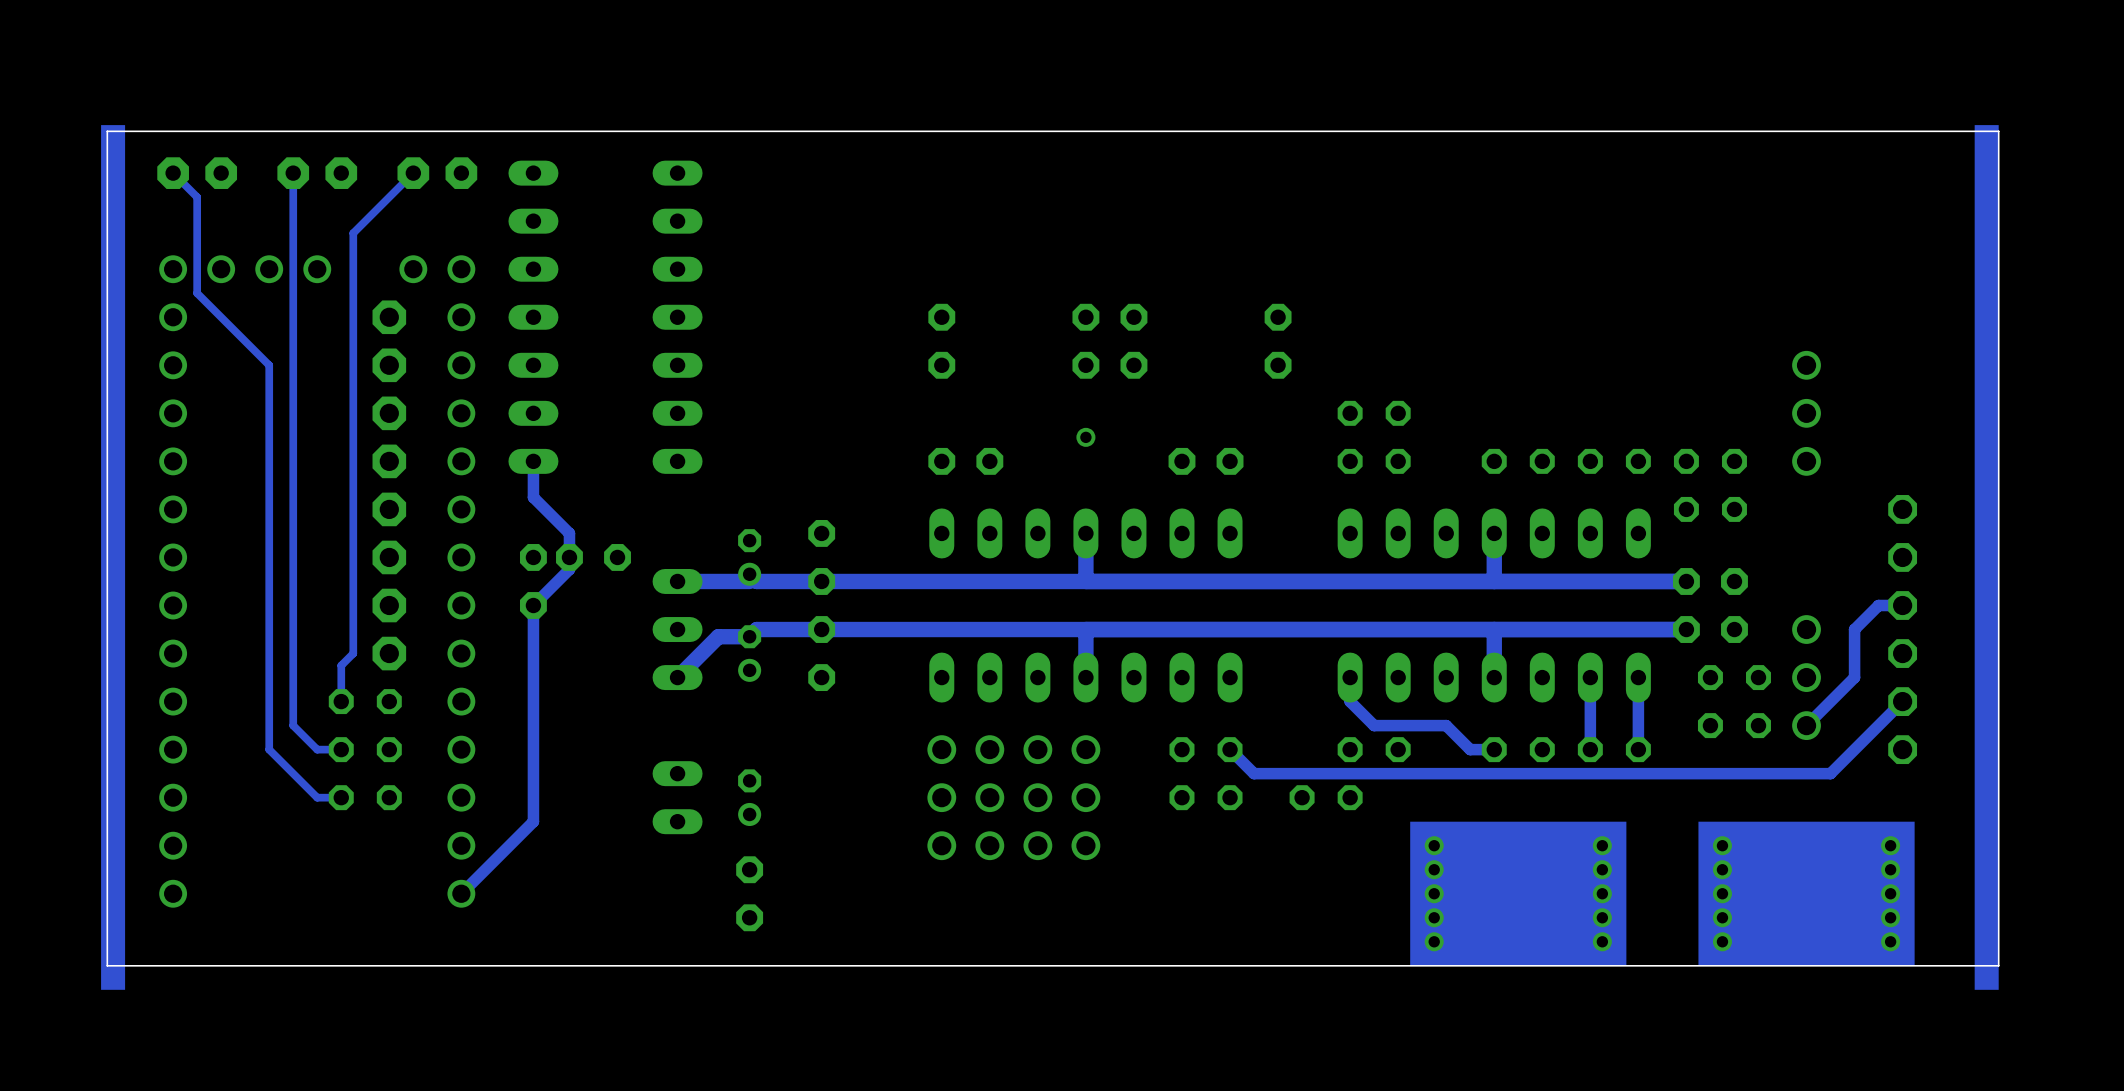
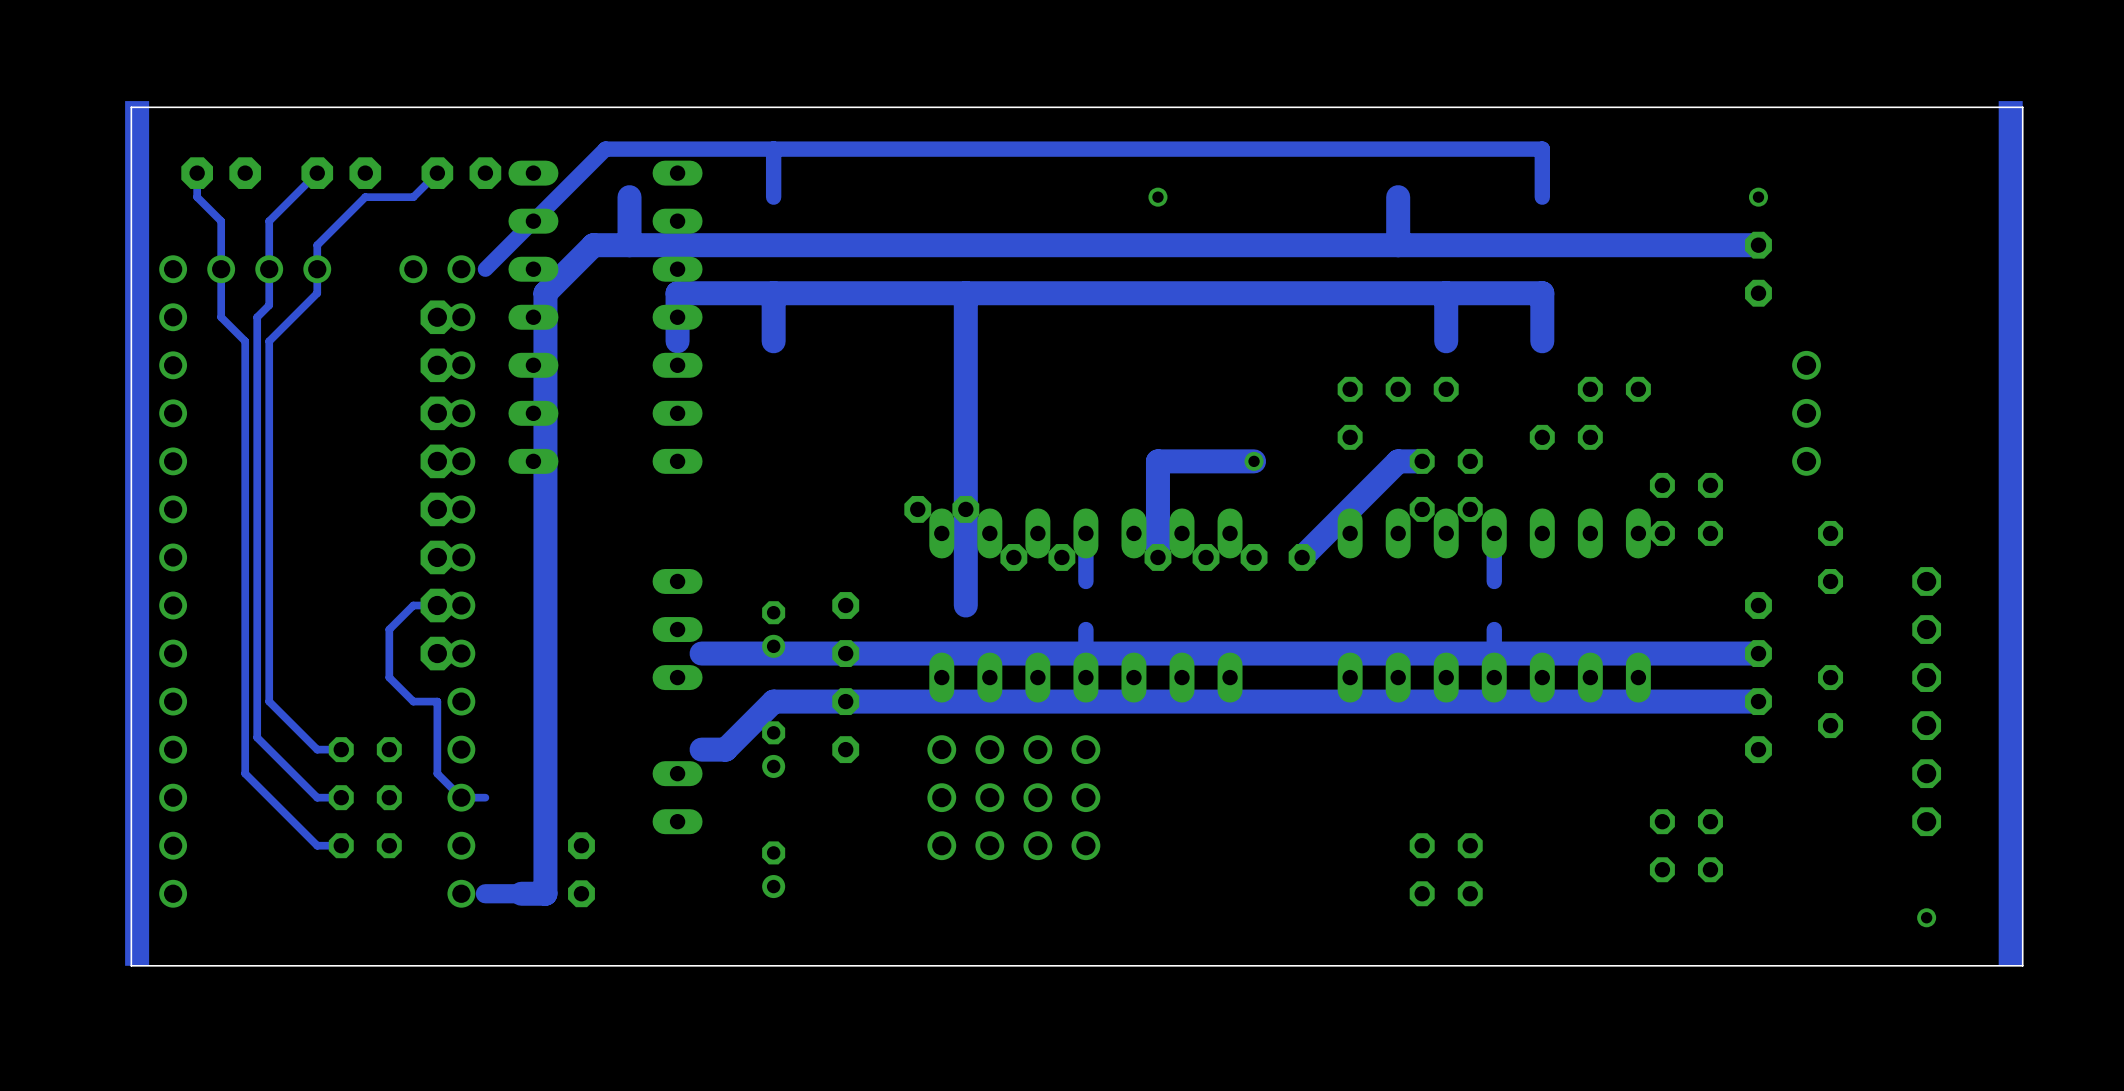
track: none -> (773, 149) (773, 197)
track: (173, 173) (197, 197) (197, 293) (221, 317) -> (197, 173) (197, 197) (221, 221) (221, 317)
part position: (197, 173) -> (221, 173)
track: (293, 173) (293, 725) -> none
track: none -> (317, 173) (269, 221) (269, 305) (257, 317) (257, 737) (269, 749)
part position: (317, 173) -> (341, 173)
track: (413, 173) (353, 233) (353, 653) (341, 665) (341, 701) -> none
part position: (437, 173) -> (461, 173)
track: none -> (629, 197) (629, 245)
via: none -> (1157, 197)
track: none -> (1398, 197) (1398, 245)
track: none -> (1542, 197) (1542, 149) (605, 149) (485, 269)
via: none -> (1758, 197)
track: none -> (1758, 245) (593, 245) (545, 293) (545, 893) (485, 893)
part: none -> (1758, 269)
track: none -> (773, 293) (773, 341)
track: none -> (965, 293) (965, 605)
track: none -> (1446, 293) (1446, 341)
track: (245, 341) (269, 365) -> (437, 173) (413, 197) (365, 197) (317, 245) (317, 293) (269, 341) (269, 365)
track: none -> (245, 341) (245, 773) (317, 845) (341, 845)
part: (941, 341) -> none
part: (1085, 341) -> none
part: (1133, 341) -> none
part: (1278, 341) -> none
track: none -> (1542, 341) (1542, 293) (677, 293) (677, 341)
part: none -> (1422, 389)
part: none -> (1614, 389)
part rotation: 0° (1374, 413) -> 90° clockwise (1350, 413)
via: (1085, 437) -> none
part: none -> (1566, 437)
track: (533, 461) (533, 497) (569, 533) (569, 569) (533, 605) (533, 821) (461, 893) -> none
part position: (965, 461) -> (941, 509)
part: (1206, 461) -> none
track: none -> (1254, 461) (1157, 461) (1157, 557)
via: none -> (1254, 461)
part: (1374, 461) -> none
track: none -> (1422, 461) (1398, 461) (1302, 557)
part: none -> (1446, 461)
part: (1518, 461) -> none
part: (1614, 461) -> none
part: (1710, 461) -> none
part position: (389, 485) -> (437, 485)
part: none -> (1686, 485)
part: none -> (1446, 509)
part: (1710, 509) -> none
part: none -> (1686, 533)
drawing position: (113, 557) -> (137, 533)
part: (593, 557) -> none
part: (749, 557) -> none
part: (821, 557) -> none
part: none -> (1037, 557)
part: none -> (1181, 557)
part: none -> (1278, 557)
part: none -> (1830, 557)
drawing position: (1986, 557) -> (2010, 533)
part: (533, 581) -> none
track: (1686, 581) (756, 581) (749, 574) (749, 581) (677, 581) -> none
part: (1710, 581) -> none
track: none -> (437, 605) (413, 605) (389, 629) (389, 677) (413, 701) (437, 701) (437, 773) (461, 797) (485, 797)
track: (1902, 605) (1878, 605) (1854, 629) (1854, 677) (1806, 725) -> none
track: (1686, 629) (756, 629) (749, 636) (718, 636) (677, 677) -> none
part: (1710, 629) -> none
part: none -> (1758, 629)
part position: (1902, 629) -> (1926, 701)
part position: (749, 653) -> (773, 629)
part position: (821, 653) -> (845, 629)
track: none -> (1758, 653) (701, 653)
track: (1350, 677) (1350, 701) (1374, 725) (1446, 725) (1470, 749) (1494, 749) -> none
track: (1590, 677) (1590, 749) -> none
track: (1638, 677) (1638, 749) -> none
part: (1734, 677) -> none
part: (1806, 677) -> none
track: (269, 701) (269, 749) -> (269, 701) (293, 725)
part position: (365, 701) -> (365, 845)
track: none -> (1758, 701) (773, 701) (725, 749) (701, 749)
part: none -> (1830, 701)
track: (1902, 701) (1830, 773) (1254, 773) (1230, 749) -> none
part: none -> (845, 725)
part: (1734, 725) -> none
part: none -> (1758, 725)
part: none -> (773, 749)
part: (1206, 749) -> none
part: (1374, 749) -> none
part: (1518, 749) -> none
part: (1614, 749) -> none
part: (749, 797) -> none
part: (1206, 797) -> none
part: (1326, 797) -> none
part: none -> (1686, 821)
via: (1434, 845) -> none
part: none -> (1446, 845)
via: (1602, 845) -> none
via: (1722, 845) -> none
via: (1890, 845) -> none
part: none -> (581, 869)
part: none -> (773, 869)
via: (1434, 869) -> none
via: (1602, 869) -> none
part: none -> (1686, 869)
via: (1722, 869) -> none
via: (1890, 869) -> none
part: (749, 893) -> none
via: (1434, 893) -> none
part: none -> (1446, 893)
part: (1518, 893) -> none
via: (1602, 893) -> none
via: (1722, 893) -> none
part: (1806, 893) -> none
via: (1890, 893) -> none
via: (1434, 917) -> none
via: (1602, 917) -> none
via: (1722, 917) -> none
via: (1890, 917) -> none
via: none -> (1926, 917)
via: (1434, 941) -> none
via: (1602, 941) -> none
via: (1722, 941) -> none
via: (1890, 941) -> none
board edge: (1998, 965) (1998, 131) (107, 131) (107, 965) (131, 965) -> (1998, 965) (2022, 965) (2022, 107) (131, 107) (131, 965)

